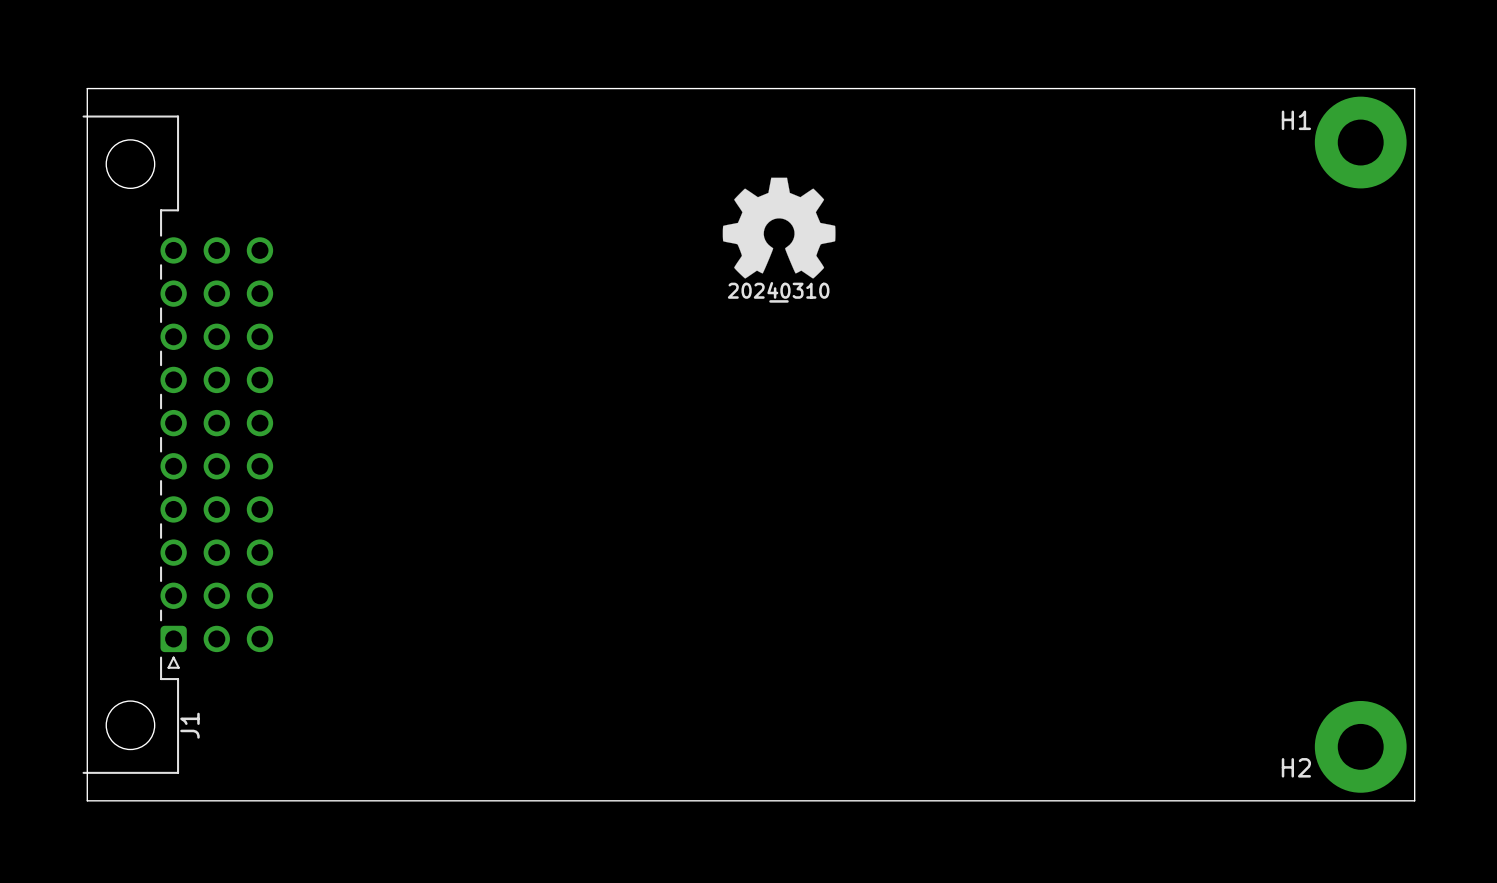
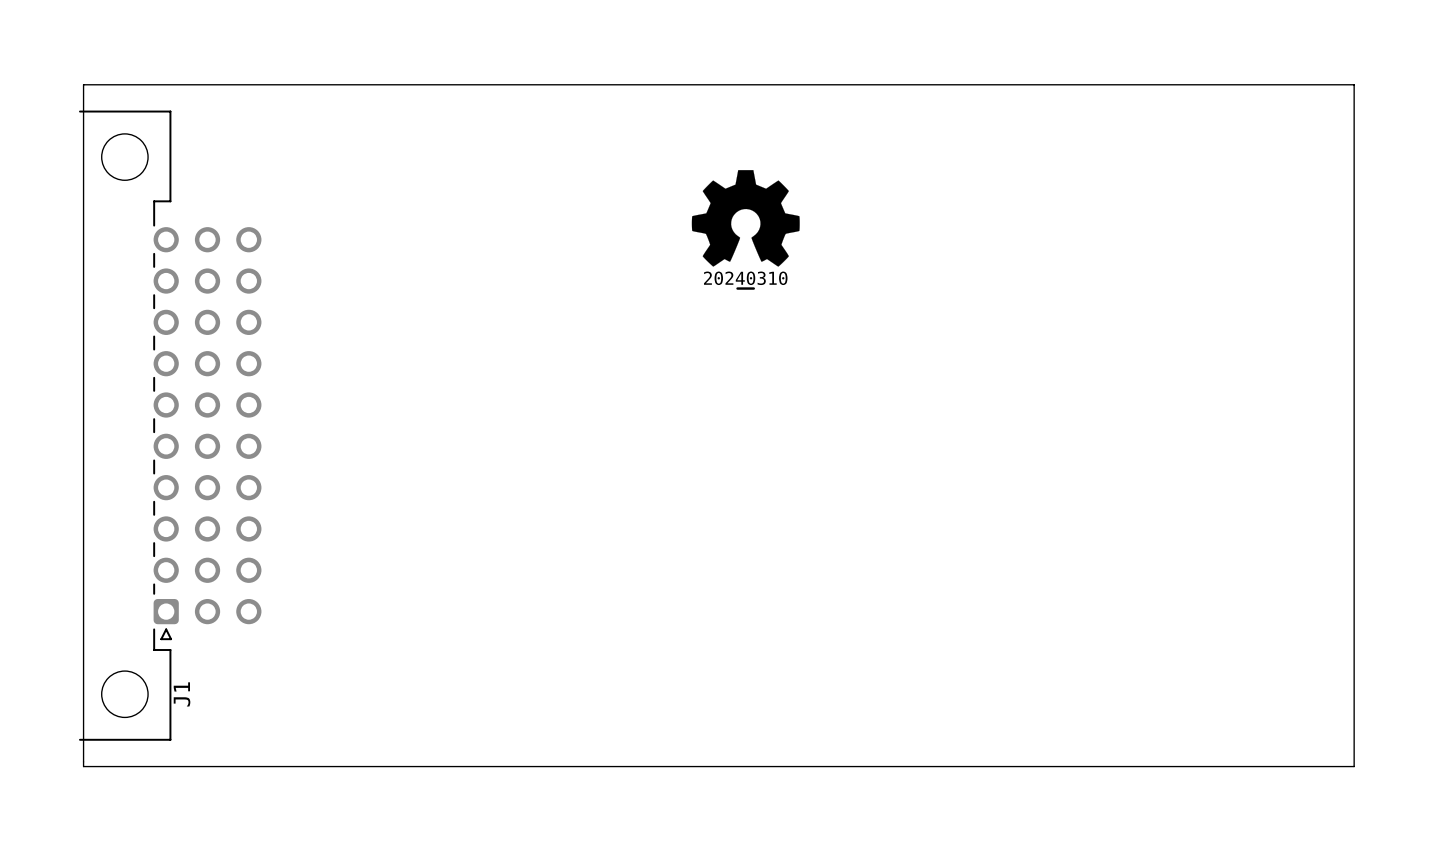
H1: (1360, 142) -> none
H2: (1360, 746) -> none

